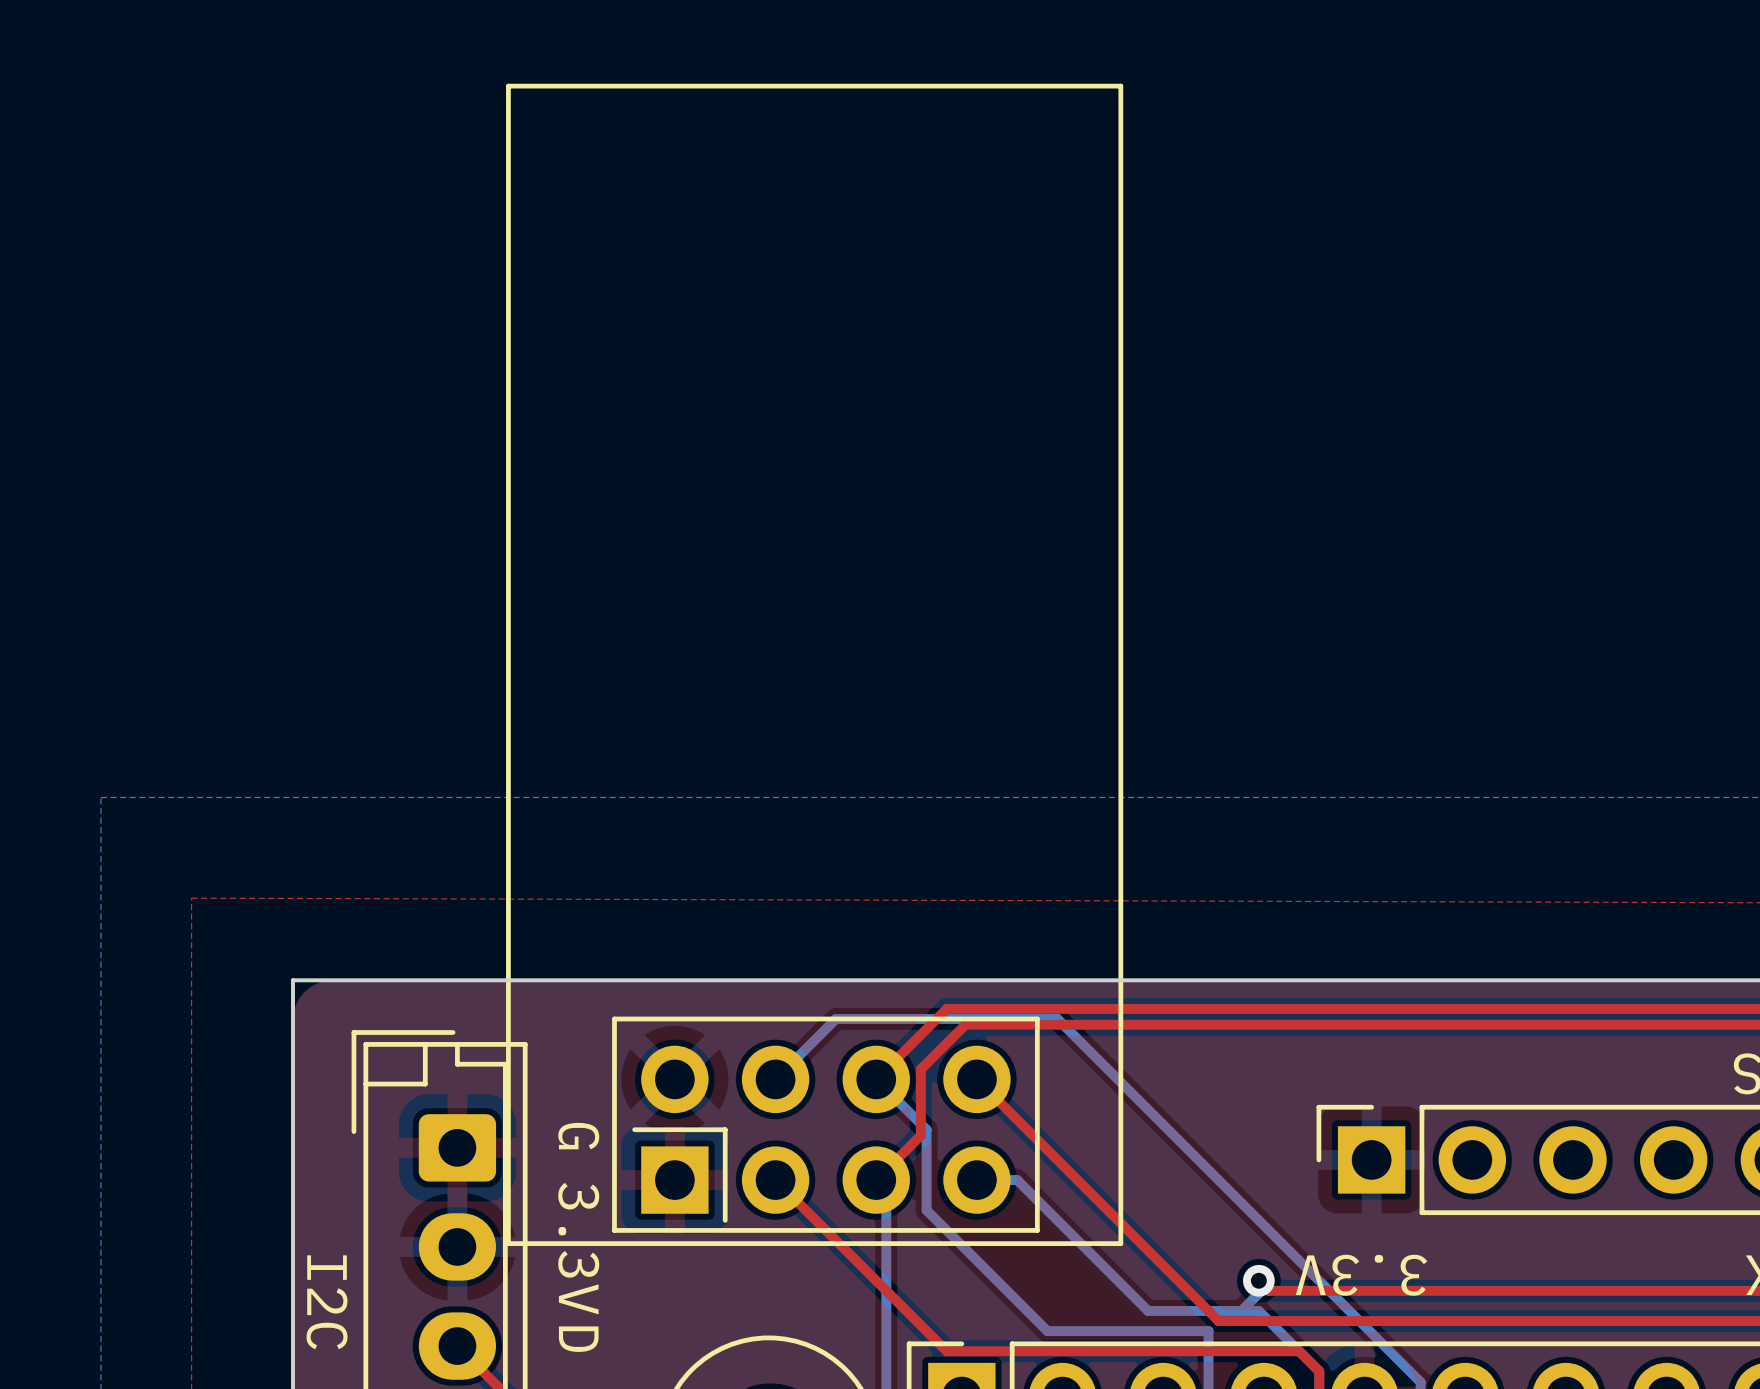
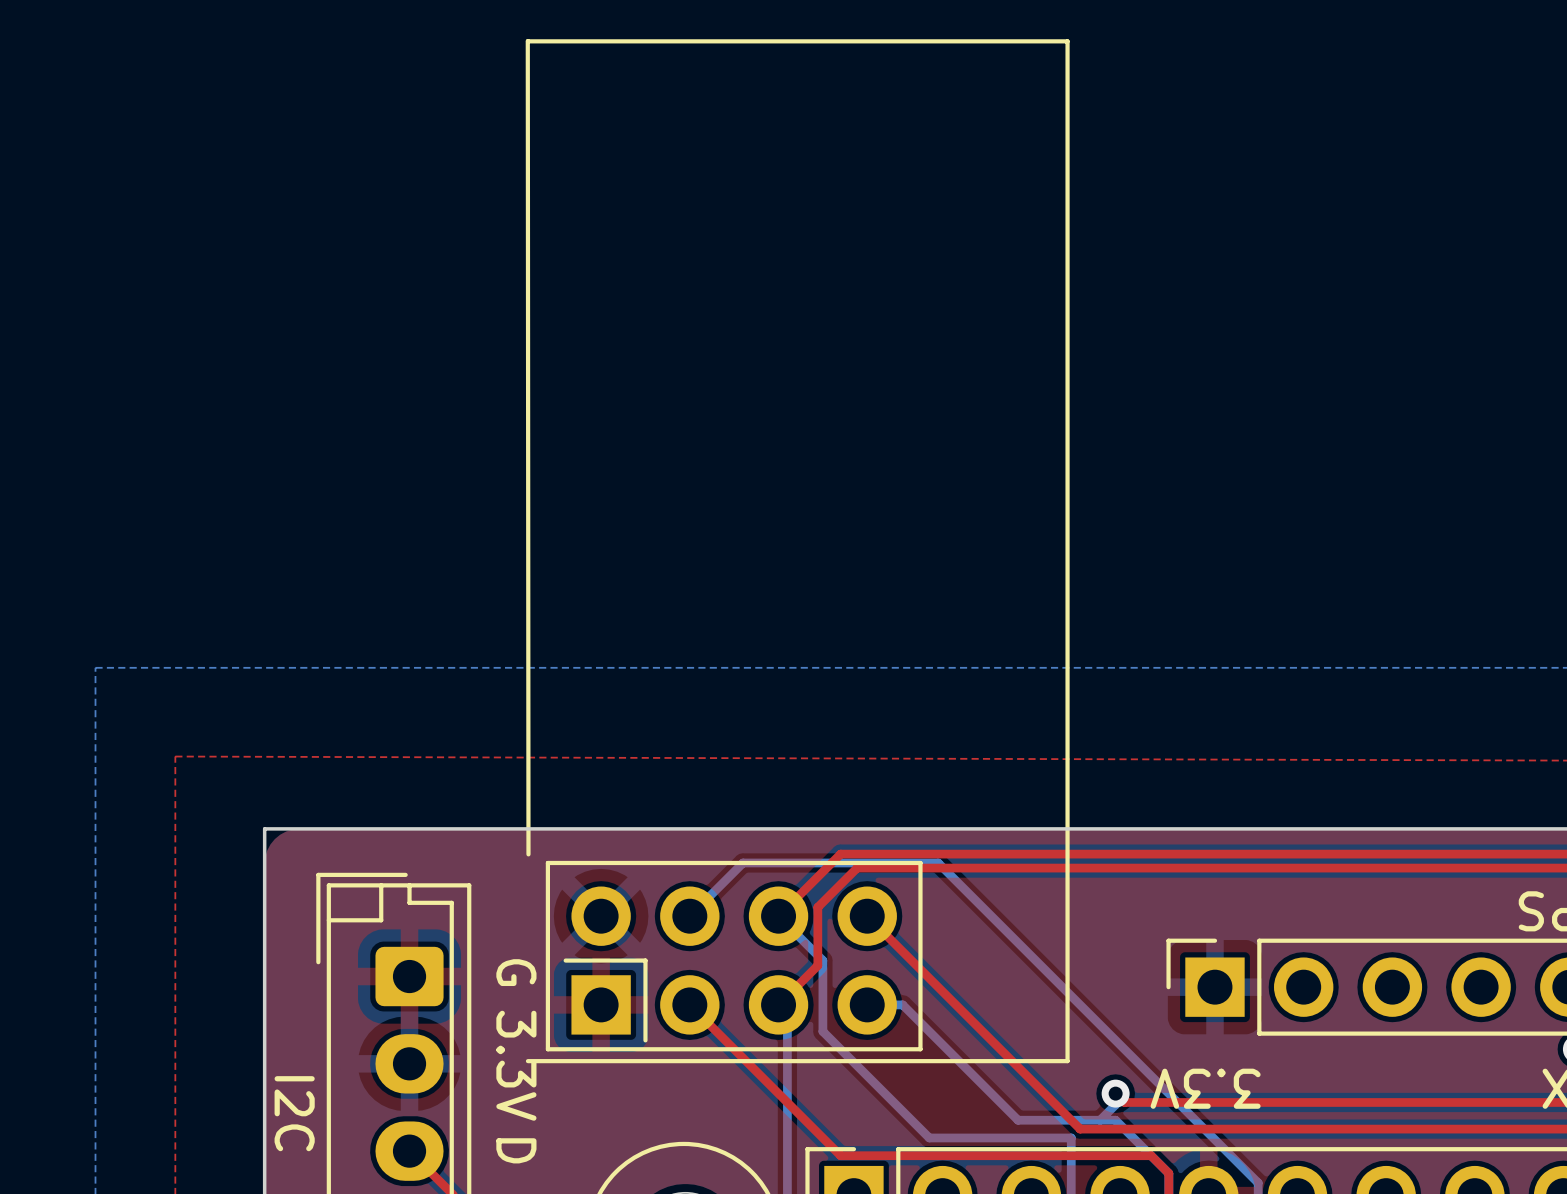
part: (814, 664) -> none
part: none -> (797, 551)

